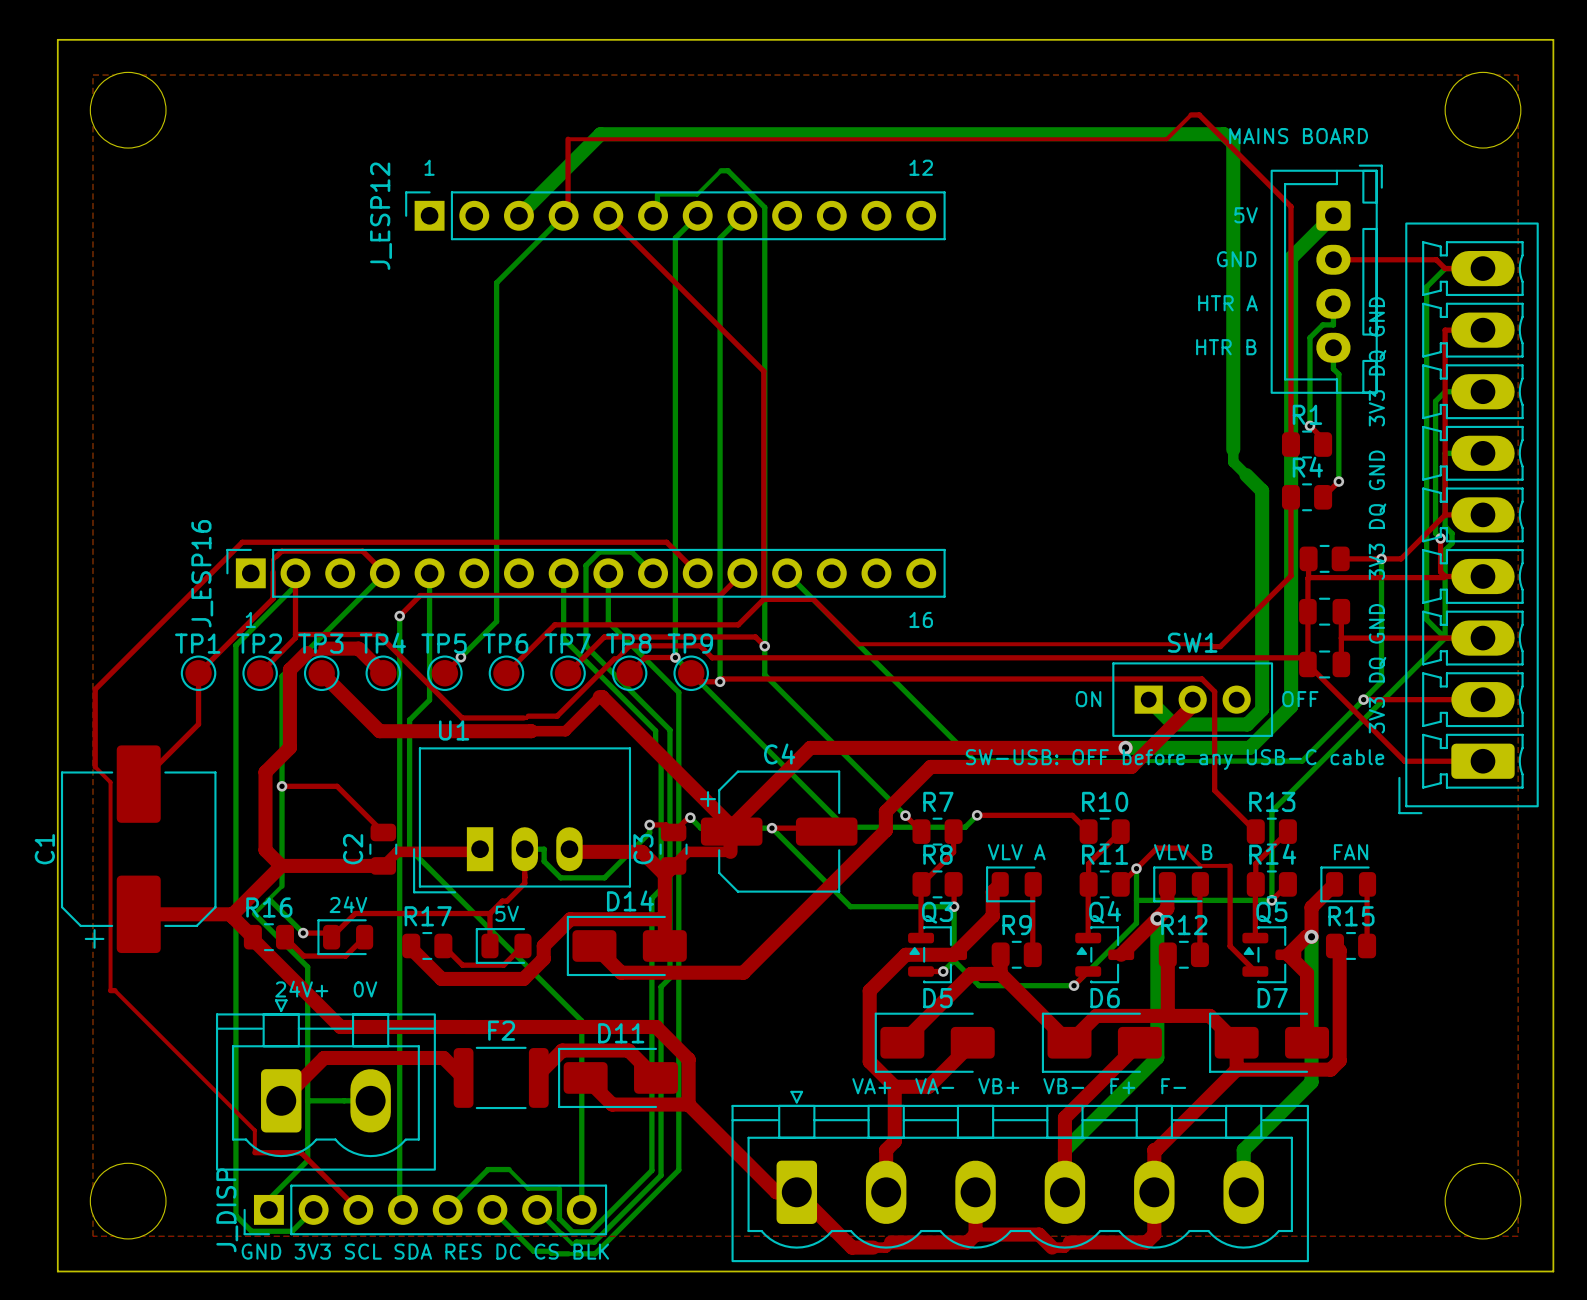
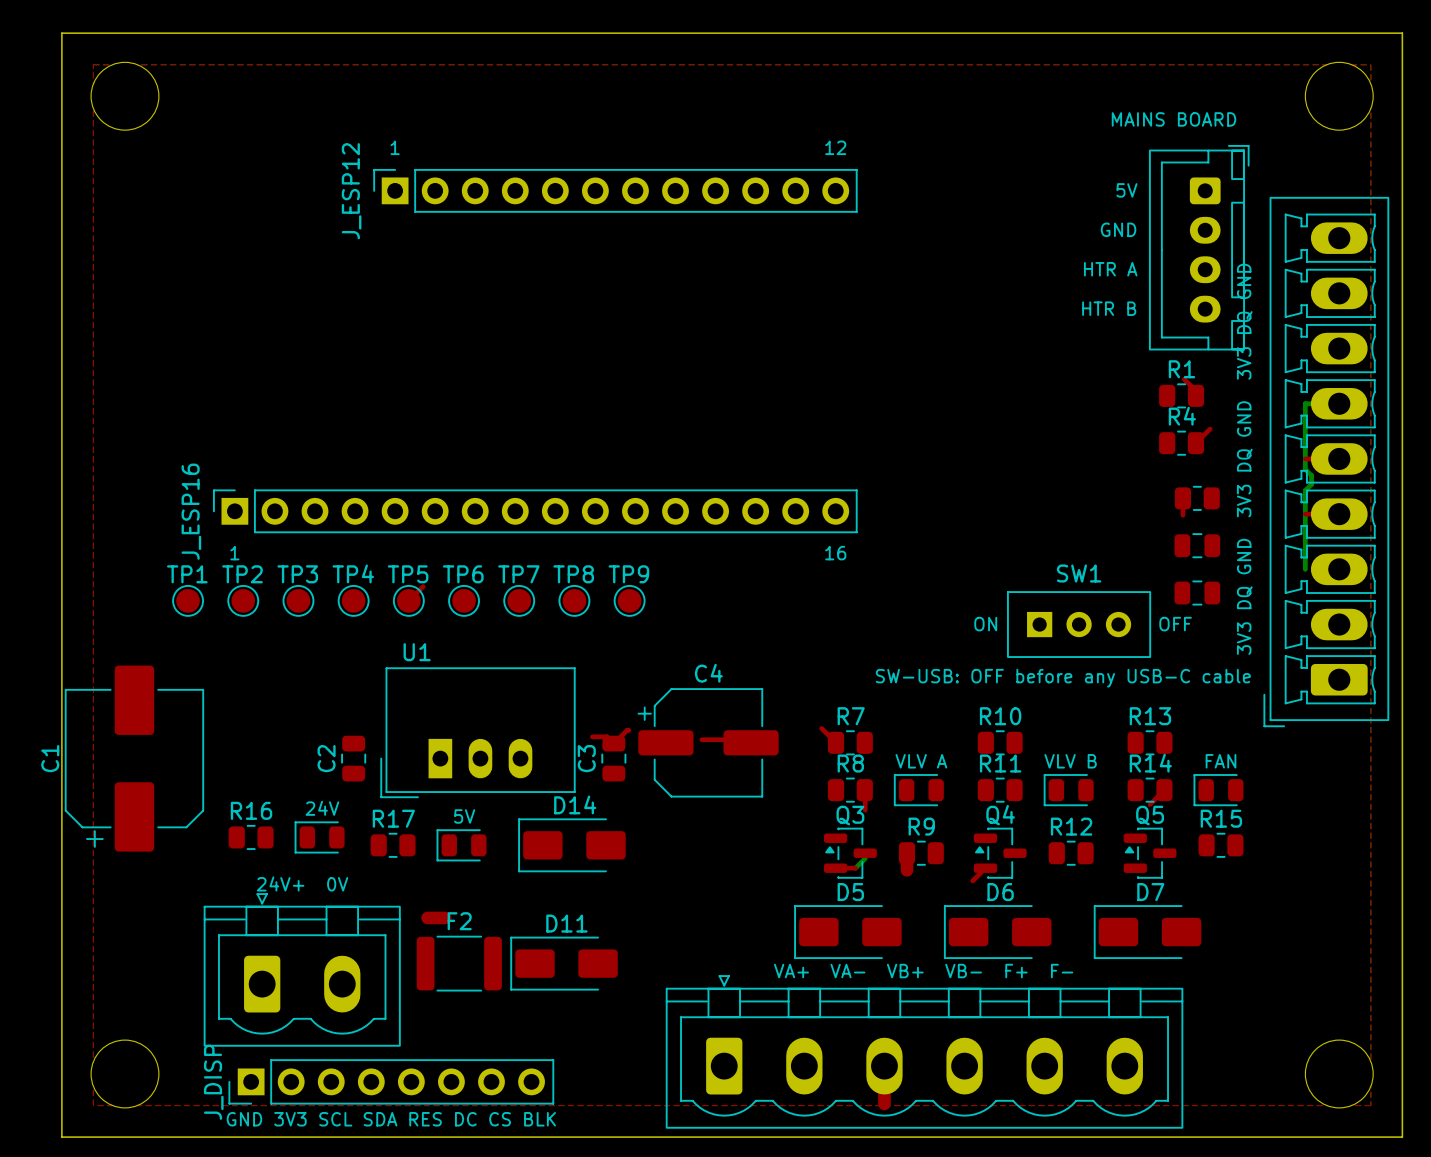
bottom track: (518, 215) (600, 134) (1223, 134) (1233, 143) (1233, 461) (1262, 490) (1262, 709) (1247, 724) (1173, 724) (1148, 699) -> none
top track: (563, 215) (568, 211) (568, 139) (1166, 139) (1191, 114) (1199, 114) (1290, 206) (1290, 444) -> none
bottom track: (563, 215) (496, 282) (496, 621) (460, 657) -> none
top track: (608, 215) (763, 371) (763, 599) -> none
bottom track: (653, 215) (657, 211) (657, 194) (697, 194) (721, 170) (728, 170) (764, 207) (764, 674) (905, 815) -> none
bottom track: (697, 215) (675, 238) (675, 657) (845, 827) (965, 827) (977, 815) -> none
bottom track: (742, 215) (720, 238) (720, 681) -> none
bottom track: (1333, 215) (1291, 258) (1291, 706) (1249, 747) (1125, 747) -> none
top track: (1333, 259) (1436, 259) (1445, 268) (1482, 268) -> none
bottom track: (1482, 268) (1445, 268) (1426, 287) (1426, 619) (1445, 638) -> none
bottom track: (1333, 303) (1333, 324) (1322, 324) (1309, 337) (1309, 425) -> none
top track: (1482, 330) (1445, 330) (1445, 514) (1401, 558) (1340, 558) -> none
bottom track: (1333, 347) (1333, 368) (1338, 374) (1338, 481) -> none
bottom track: (1482, 391) (1445, 391) (1435, 401) (1435, 533) (1440, 538) -> none
via: (1309, 425) -> none
via: (1338, 481) -> none
top track: (1290, 497) (1290, 575) (1220, 646) (1213, 646) (1210, 644) (858, 644) (813, 599) (763, 599) -> none
top track: (1440, 538) (1440, 571) (1445, 576) (1444, 577) (1308, 577) (1307, 664) (1404, 761) (1482, 761) -> none
via: (1440, 538) -> none
bottom track: (1381, 558) (1381, 681) (1302, 761) (974, 761) (787, 573) -> none
via: (1381, 558) -> none
top track: (295, 573) (295, 637) (260, 673) -> none
bottom track: (295, 573) (295, 585) (235, 645) (235, 1215) (251, 1231) (292, 1231) (313, 1209) -> none
top track: (384, 573) (362, 551) (281, 551) (273, 559) (273, 598) (198, 673) (198, 724) (138, 784) -> none
bottom track: (384, 573) (282, 676) (282, 886) (270, 899) -> none
bottom track: (429, 573) (429, 700) (409, 720) (409, 848) (581, 1020) (581, 1209) -> none
bottom track: (563, 573) (563, 638) (655, 730) (655, 749) (661, 755) (661, 889) (651, 898) (651, 1170) (590, 1231) (572, 1231) (559, 1218) (559, 1188) (528, 1188) (509, 1169) (488, 1169) (447, 1209) -> none
bottom track: (608, 573) (608, 622) (678, 692) (678, 1170) (595, 1253) (551, 1253) (548, 1251) (533, 1251) (492, 1209) -> none
bottom track: (653, 573) (631, 552) (599, 552) (586, 565) (586, 646) (669, 730) (669, 977) (661, 986) (661, 1175) (594, 1242) (572, 1243) (537, 1209) -> none
top track: (697, 573) (666, 542) (242, 542) (95, 689) (95, 766) (110, 782) (110, 990) (114, 990) (254, 1130) (254, 1152) (301, 1152) (358, 1209) -> none
top track: (742, 573) (720, 595) (420, 595) (399, 616) -> none
top track: (763, 599) (738, 624) (554, 624) (506, 673) -> none
top track: (1341, 611) (1341, 664) -> none
bottom track: (399, 616) (399, 1206) (403, 1209) -> none
via: (399, 616) -> none
top track: (295, 634) (378, 634) (462, 717) (557, 716) (629, 645) (700, 645) (712, 657) (1307, 657) -> none
top track: (1341, 638) (1482, 638) -> none
bottom track: (1445, 638) (1271, 811) (1271, 900) (1136, 900) -> none
top track: (764, 646) (755, 637) (604, 637) (568, 673) -> none
via: (764, 646) -> none
via: (460, 657) -> none
top track: (675, 657) (645, 657) (629, 673) -> none
via: (675, 657) -> none
top track: (321, 673) (379, 731) (565, 731) (599, 697) (602, 697) (731, 826) -> none
top track: (383, 673) (358, 648) (325, 648) (320, 652) (306, 652) (289, 669) (289, 747) (265, 772) (265, 850) (281, 865) -> none
top track: (691, 673) (699, 681) (720, 681) (722, 678) (1201, 678) (1214, 691) (1214, 790) (1255, 831) -> none
via: (720, 681) -> none
top track: (1192, 699) (1192, 705) (1131, 766) (930, 766) (885, 811) (885, 830) (743, 972) (621, 972) (594, 945) -> none
top track: (1363, 699) (1482, 699) -> none
via: (1363, 699) -> none
top track: (1125, 747) (810, 747) (731, 826) -> none
via: (1125, 747) -> none
top track: (282, 786) (337, 786) (383, 832) -> none
via: (282, 786) -> none
via: (905, 815) -> none
top track: (977, 815) (1072, 815) (1088, 831) -> none
via: (977, 815) -> none
bottom track: (690, 817) (700, 828) (771, 828) (850, 906) (954, 906) (954, 960) (979, 985) (1074, 985) (1136, 923) (1136, 868) -> none
via: (690, 817) -> none
bottom track: (649, 824) (649, 832) (604, 877) (560, 877) (544, 861) (544, 849) (524, 849) -> none
via: (649, 824) -> none
top track: (731, 826) (730, 851) (687, 851) (664, 874) -> none
via: (771, 828) -> none
top track: (953, 831) (953, 852) (921, 884) (921, 938) -> none
top track: (1120, 831) (1088, 863) (1088, 938) -> none
top track: (1287, 831) (1255, 863) (1255, 938) -> none
top track: (480, 849) (480, 851) (397, 851) (383, 865) (281, 865) -> none
top track: (524, 849) (524, 883) (506, 901) (502, 901) (489, 913) -> none
top track: (569, 849) (574, 849) (577, 851) (641, 851) (664, 874) -> none
top track: (281, 865) (232, 914) -> none
via: (1136, 868) -> none
top track: (664, 874) (664, 945) -> none
top track: (1000, 884) (992, 891) (992, 916) (954, 954) (905, 954) (869, 990) (869, 1061) (894, 1086) -> none
top track: (1033, 884) (1032, 954) -> none
top track: (1120, 884) (1157, 848) (1182, 848) (1200, 865) (1230, 865) (1230, 946) (1255, 971) -> none
top track: (1167, 884) (1167, 908) (1121, 954) -> none
top track: (1200, 884) (1199, 954) -> none
top track: (1334, 884) (1311, 907) (1311, 936) (1306, 936) (1288, 954) (1307, 973) (1307, 1042) -> none
top track: (1367, 884) (1367, 945) -> none
bottom track: (270, 899) (303, 933) -> none
bottom track: (270, 899) (254, 913) (307, 967) (307, 1160) (268, 1199) (268, 1209) -> none
via: (1271, 900) -> none
via: (954, 906) -> none
top track: (489, 913) (489, 945) -> none
top track: (489, 913) (355, 913) (331, 937) (327, 933) (303, 933) -> none
top track: (138, 914) (232, 914) -> none
top track: (232, 914) (232, 917) (252, 939) (340, 1026) (465, 1026) -> none
bottom track: (1157, 918) (1157, 1057) (1064, 1150) (1064, 1192) -> none
via: (1157, 918) -> none
top track: (664, 919) (570, 919) (543, 945) (543, 958) (523, 978) (441, 978) (411, 948) (411, 945) -> none
via: (303, 933) -> none
bottom track: (1311, 936) (1311, 1082) (1243, 1150) (1243, 1192) -> none
via: (1311, 936) -> none
top track: (284, 937) (303, 956) (345, 956) (364, 937) -> none
top track: (443, 945) (462, 965) (503, 965) (522, 945) -> none
top track: (1334, 945) (1339, 950) (1339, 1060) (1330, 1069) (1236, 1069) -> none
top track: (1167, 954) (1167, 1015) -> none
via: (943, 971) -> none
via: (1074, 985) -> none
top track: (485, 1026) (656, 1026) (688, 1059) (688, 1104) -> none
top track: (902, 1042) (971, 973) (1000, 973) (1069, 1042) (1096, 1015) (1209, 1015) (1236, 1042) (1236, 1069) -> none
top track: (972, 1042) (928, 1086) (894, 1086) -> none
top track: (1139, 1042) (1064, 1117) (1064, 1192) -> none
top track: (1236, 1069) (1154, 1150) (1154, 1234) (1146, 1242) (1069, 1242) (1064, 1247) (1052, 1247) (1039, 1234) (975, 1234) (967, 1242) (891, 1242) (885, 1247) (852, 1247) (796, 1192) (776, 1192) (688, 1104) -> none
top track: (463, 1077) (443, 1057) (324, 1057) (281, 1100) -> none
top track: (538, 1077) (538, 1074) (562, 1050) (628, 1050) (656, 1077) -> none
top track: (585, 1077) (612, 1104) (688, 1104) -> none
top track: (894, 1086) (894, 1141) (886, 1150) (886, 1192) -> none
bottom track: (307, 1100) (370, 1100) -> none

